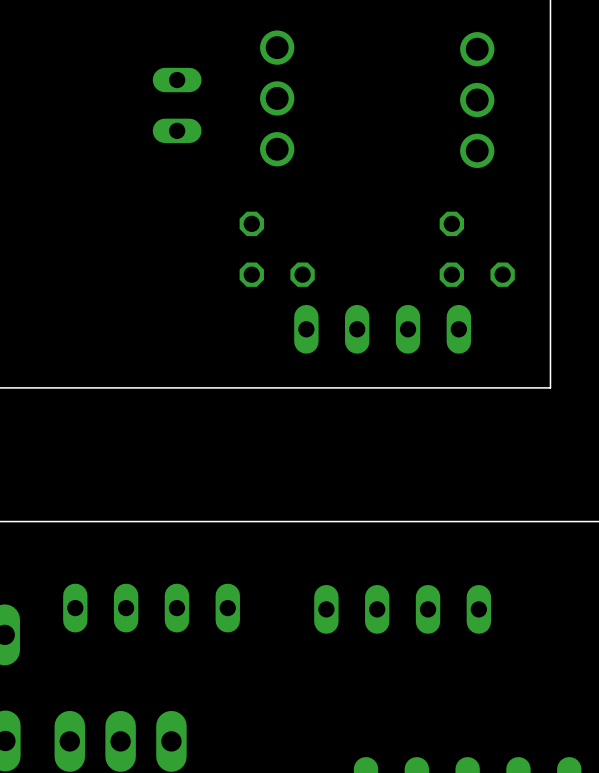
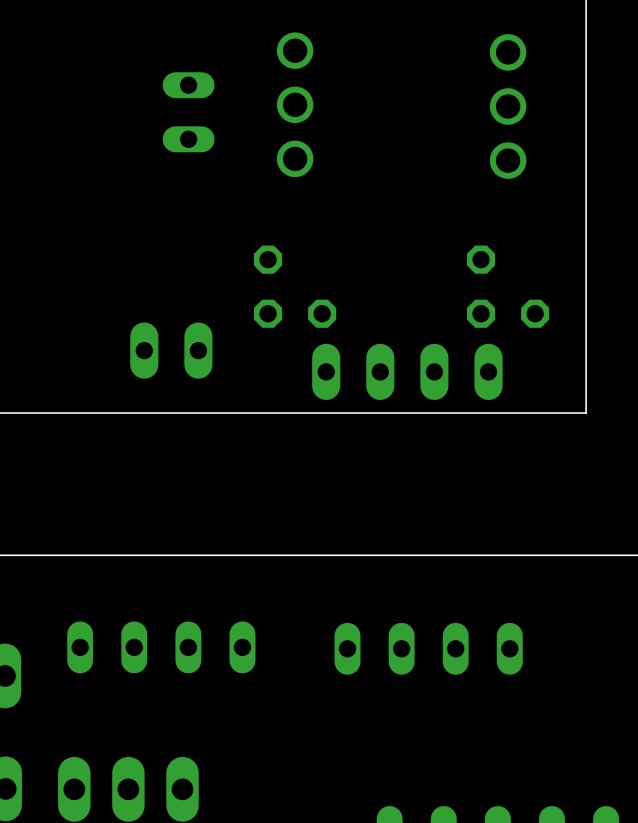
part footprint: [239, 211, 315, 287] -> [253, 245, 337, 328]
part footprint: [439, 211, 515, 287] -> [467, 245, 550, 328]
part footprint: [294, 304, 472, 354] -> [312, 343, 503, 401]
part: none -> (171, 350)

